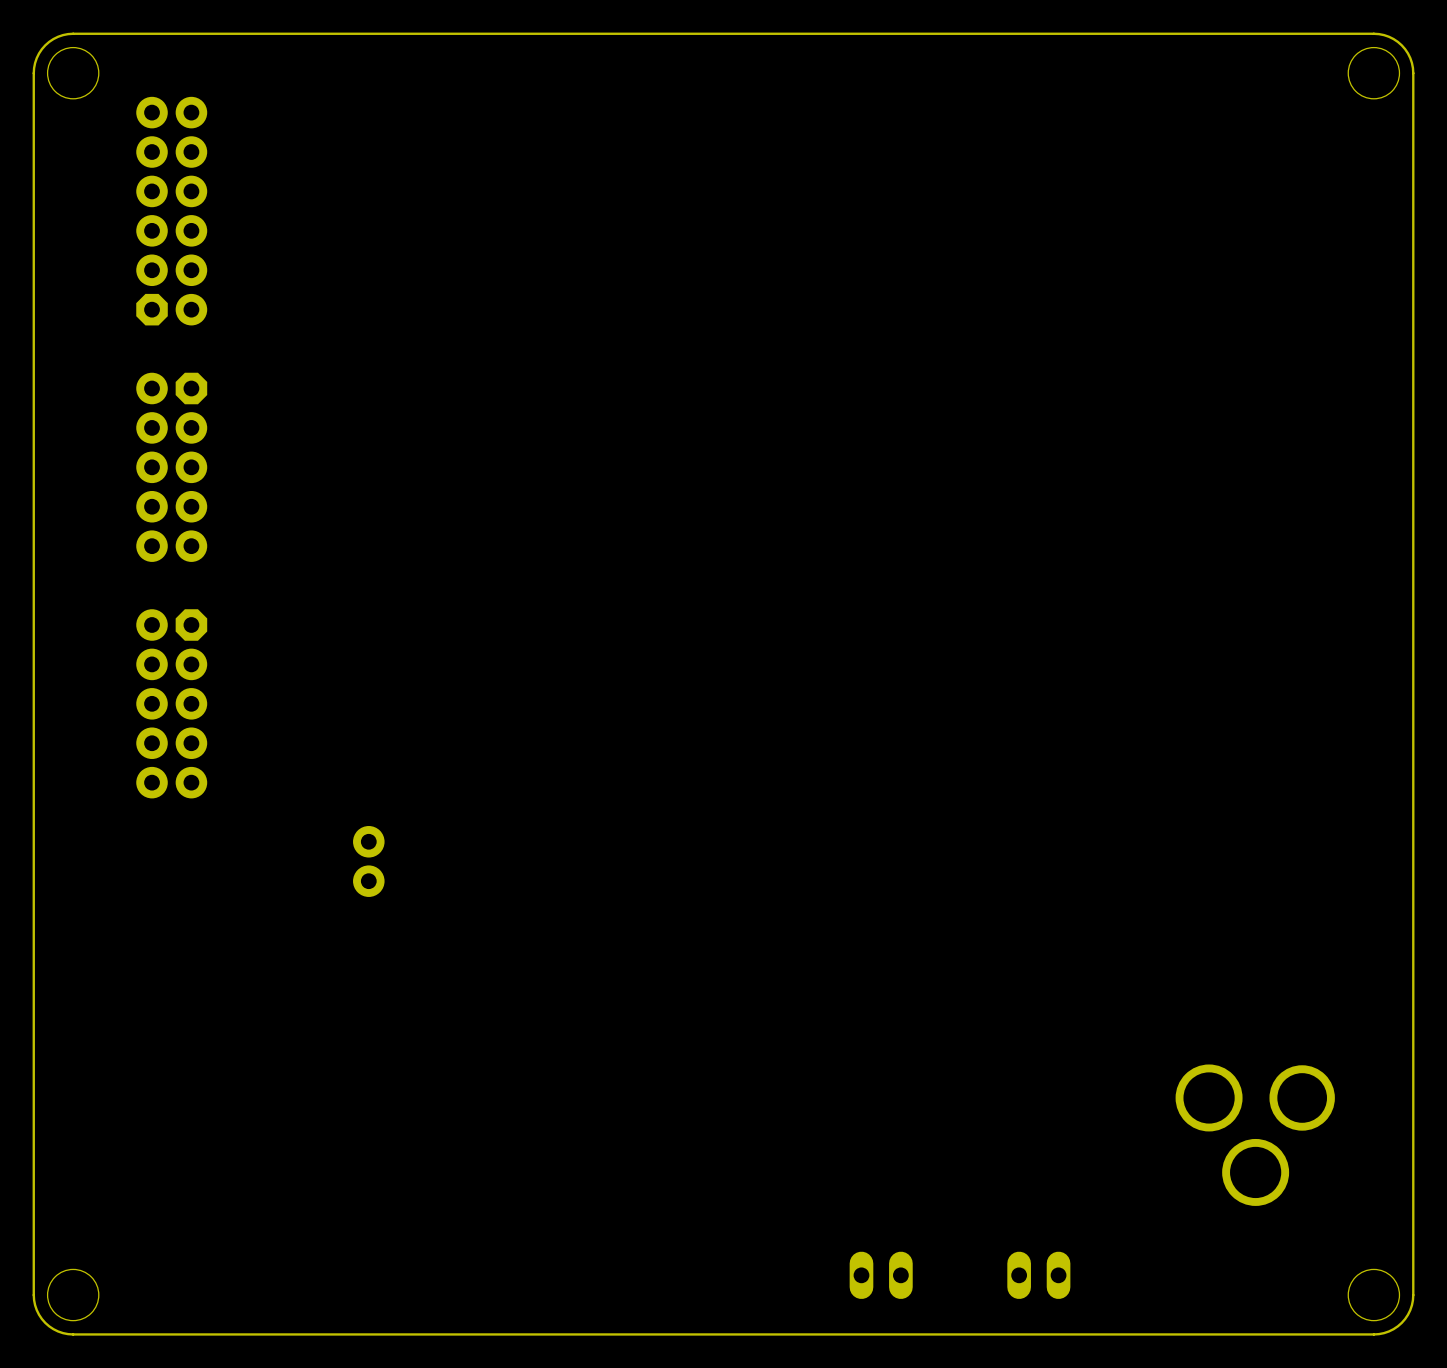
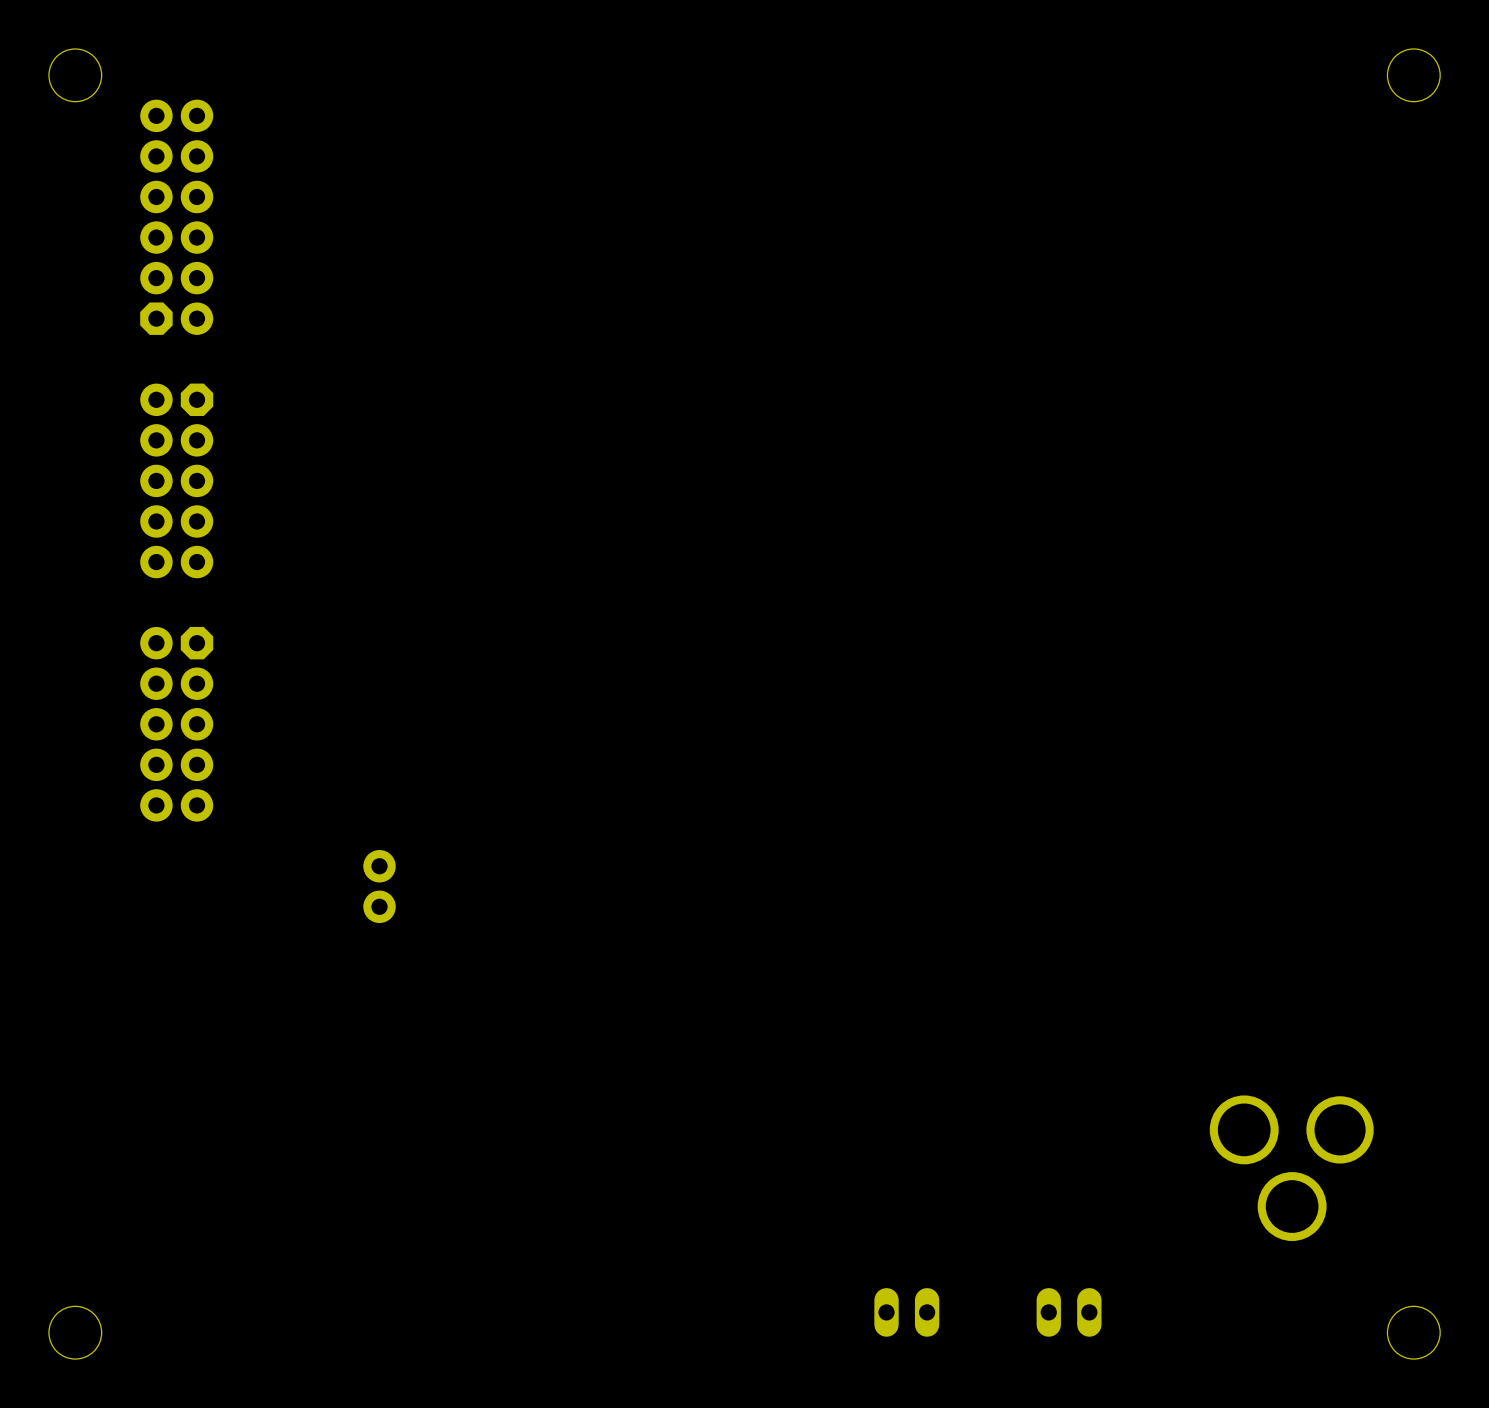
board edge: (1373, 33) (73, 33) (58, 36) (45, 45) (36, 58) (33, 73) (33, 1295) (36, 1310) (45, 1322) (58, 1331) (73, 1334) (1373, 1334) (1388, 1331) (1401, 1322) (1410, 1310) (1413, 1295) (1413, 73) (1410, 58) (1401, 45) (1388, 36) (1373, 33) -> none

